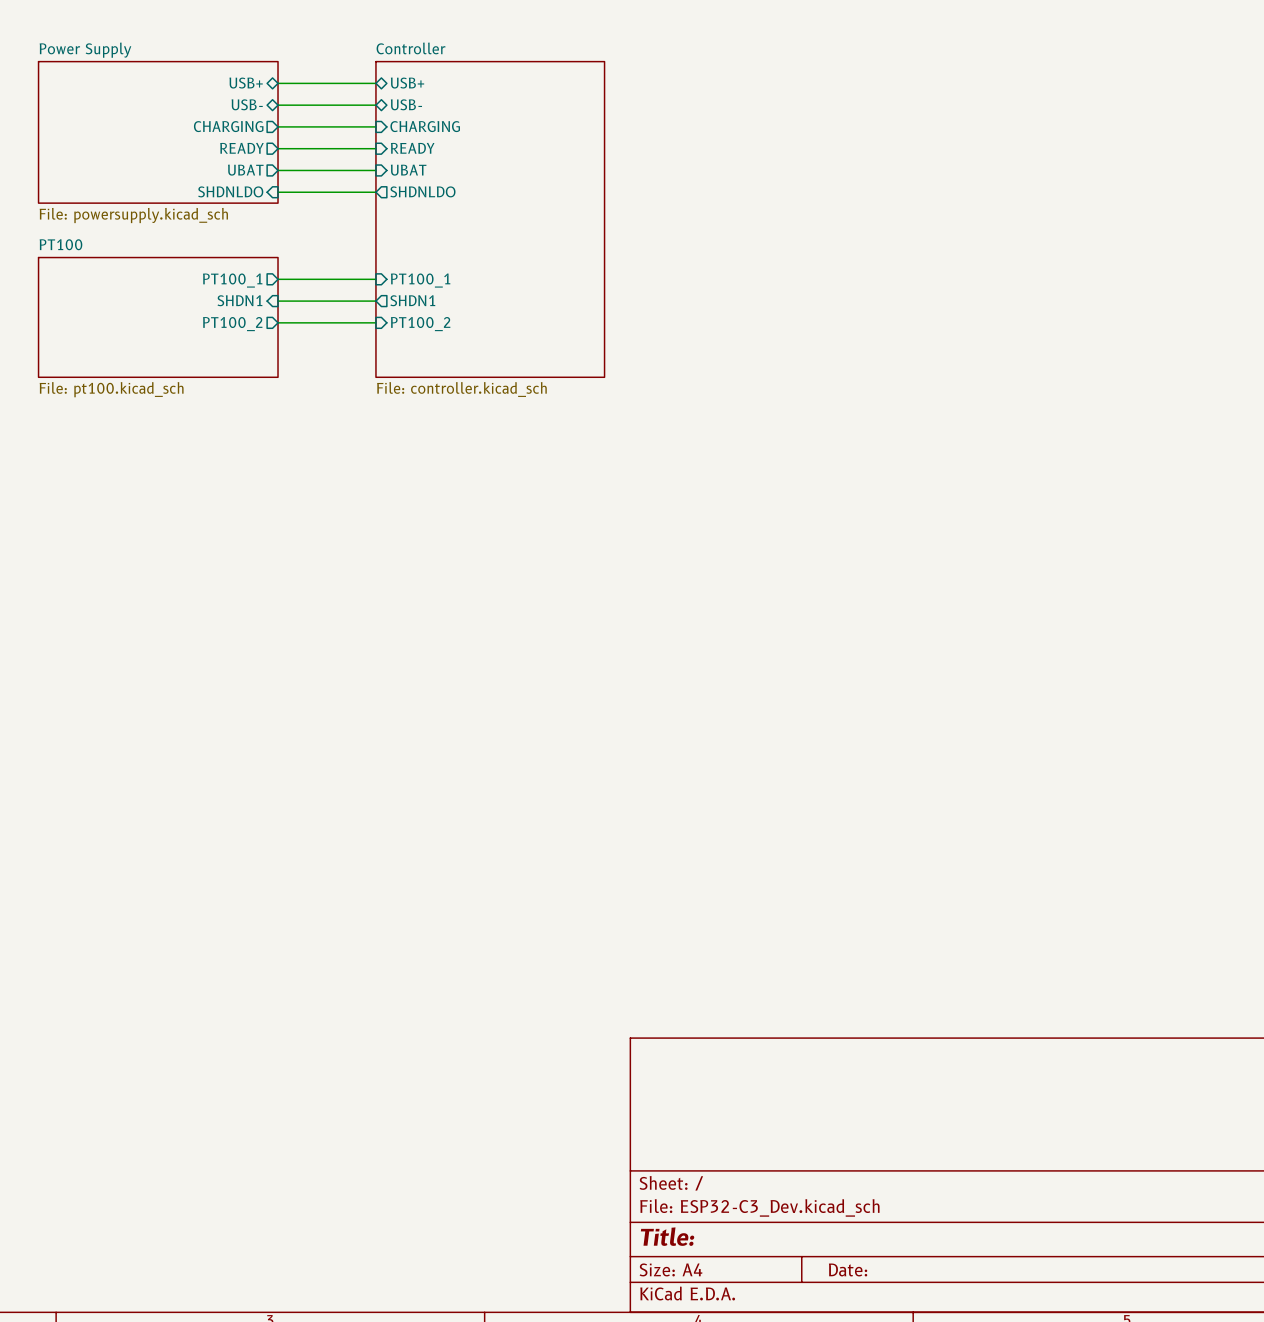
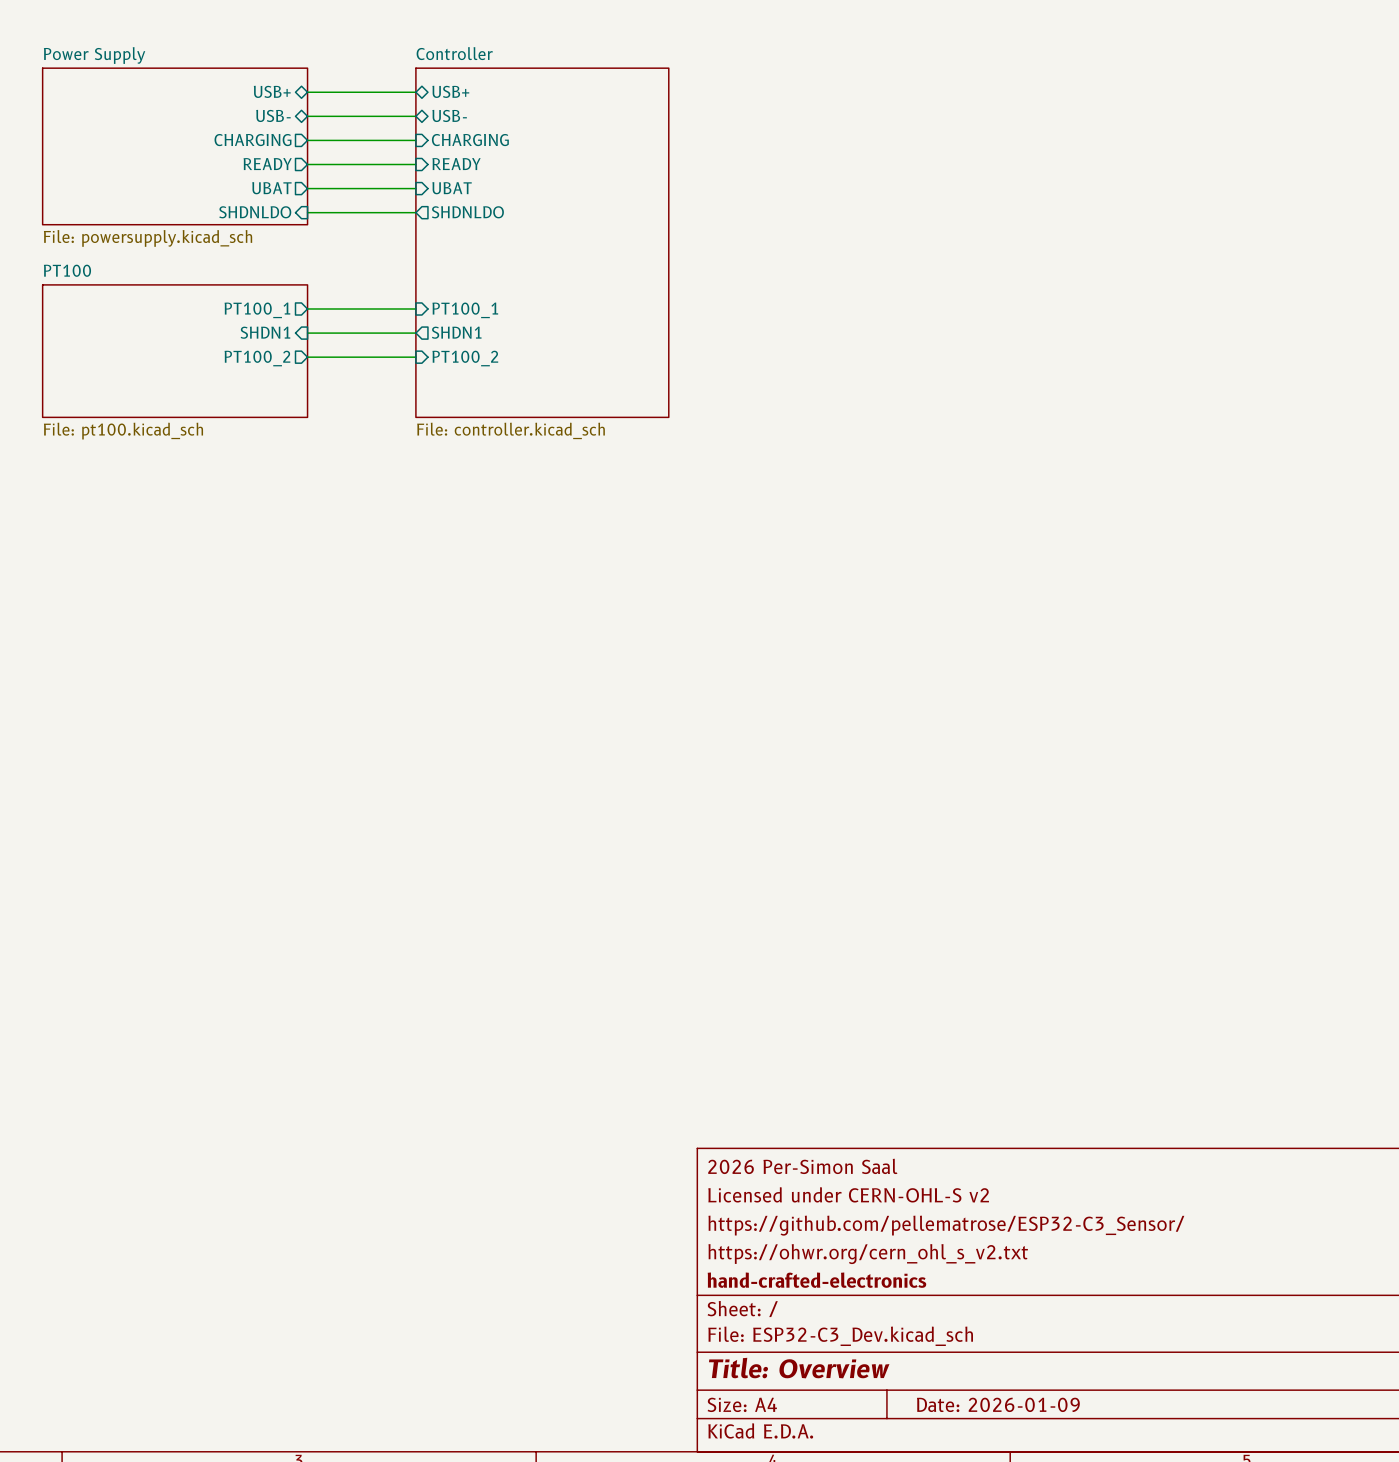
title block: none -> 2026 Per-Simon Saal (802, 1166)
title block: none -> Licensed under CERN-OHL-S v2 (848, 1194)
title block: none -> https://github.com/pellematrose/ESP32-C3_Sensor/ (946, 1225)
title block: none -> https://ohwr.org/cern_ohl_s_v2.txt (868, 1254)
title block: none -> hand-crafted-electronics (816, 1280)
title block: Title: (667, 1236) -> Title: Overview (799, 1368)
title block: Date: (848, 1269) -> Date: 2026-01-09 (998, 1404)

